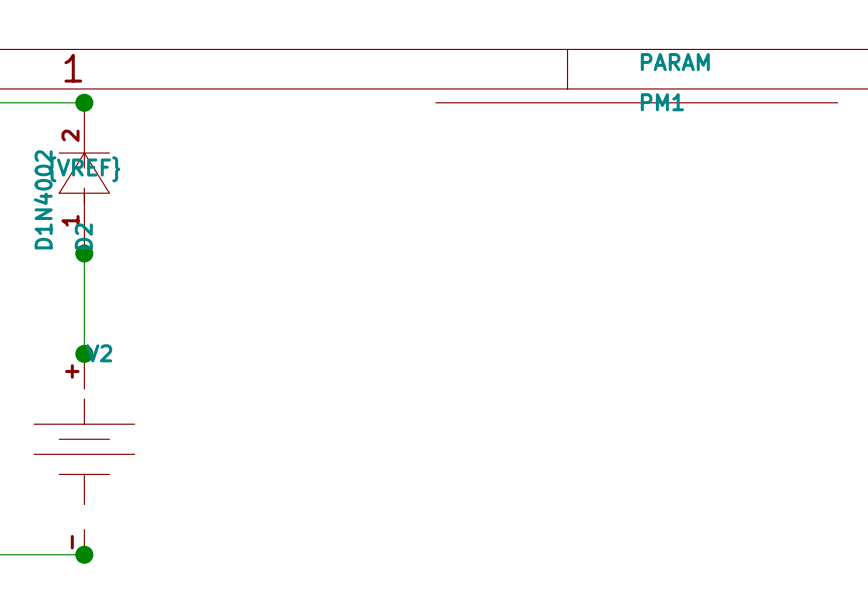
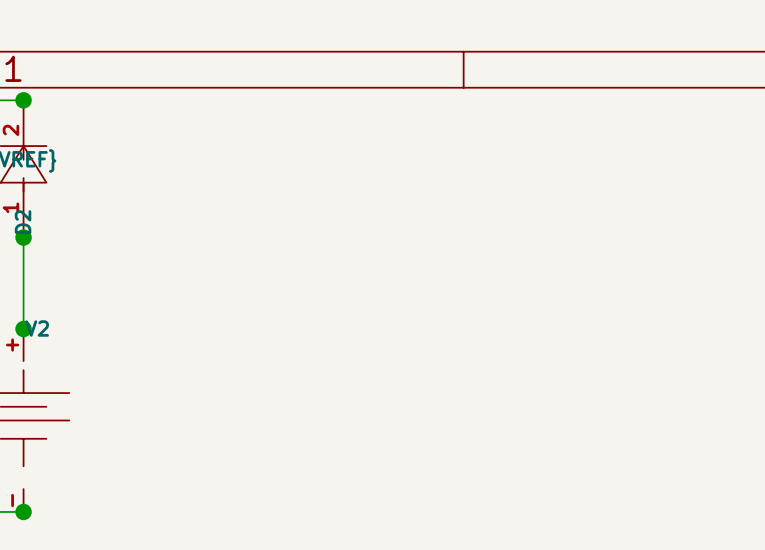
PM1: PARAM (636, 102) -> none

